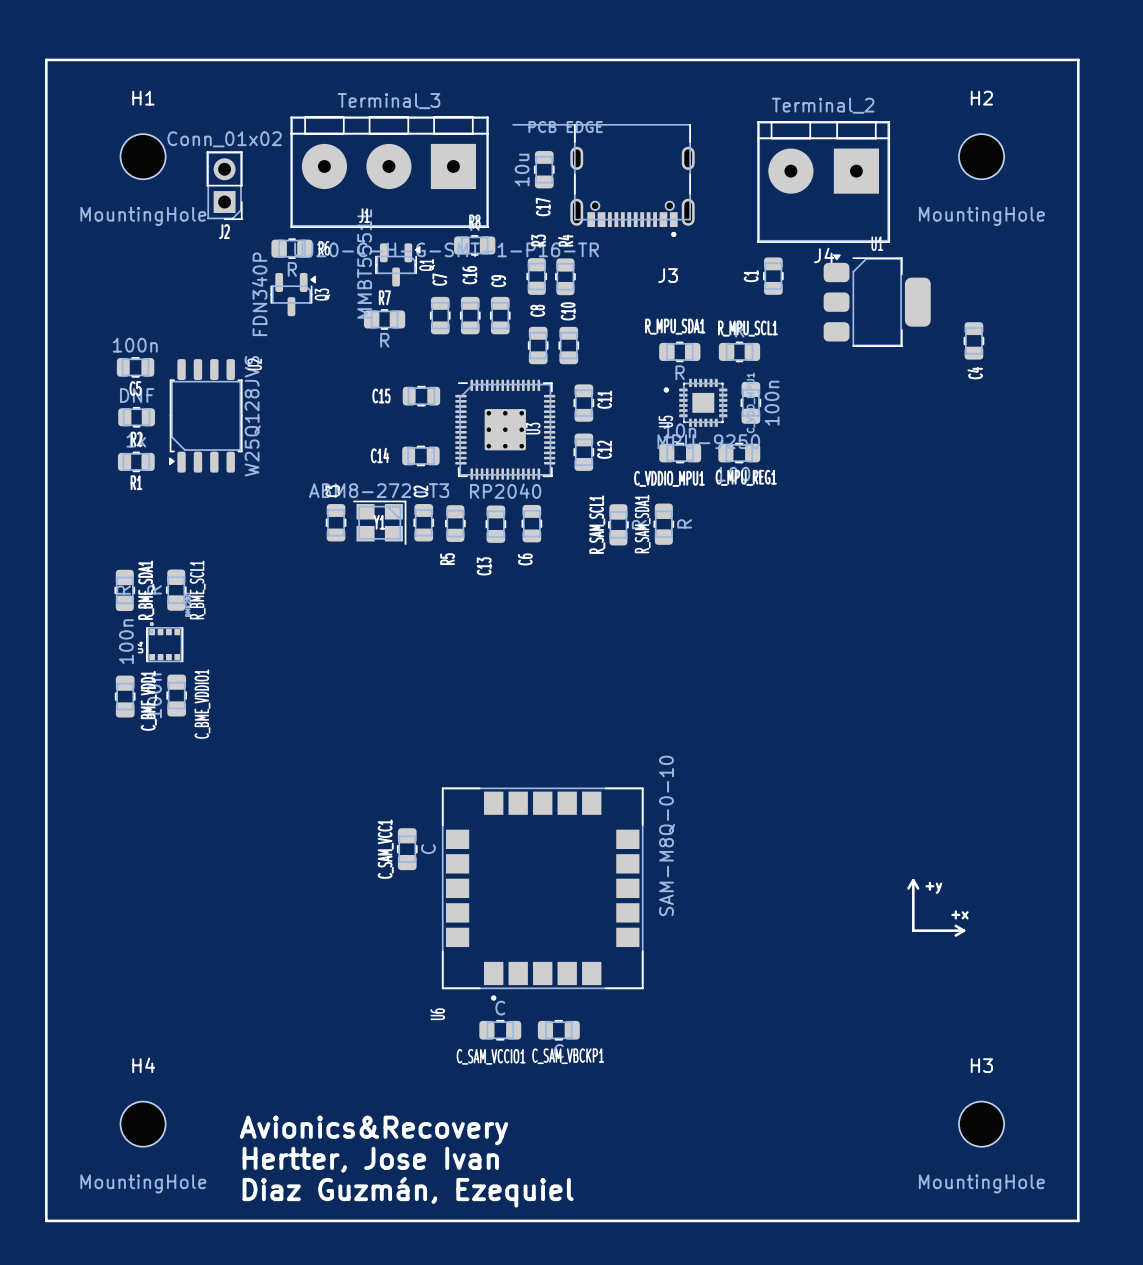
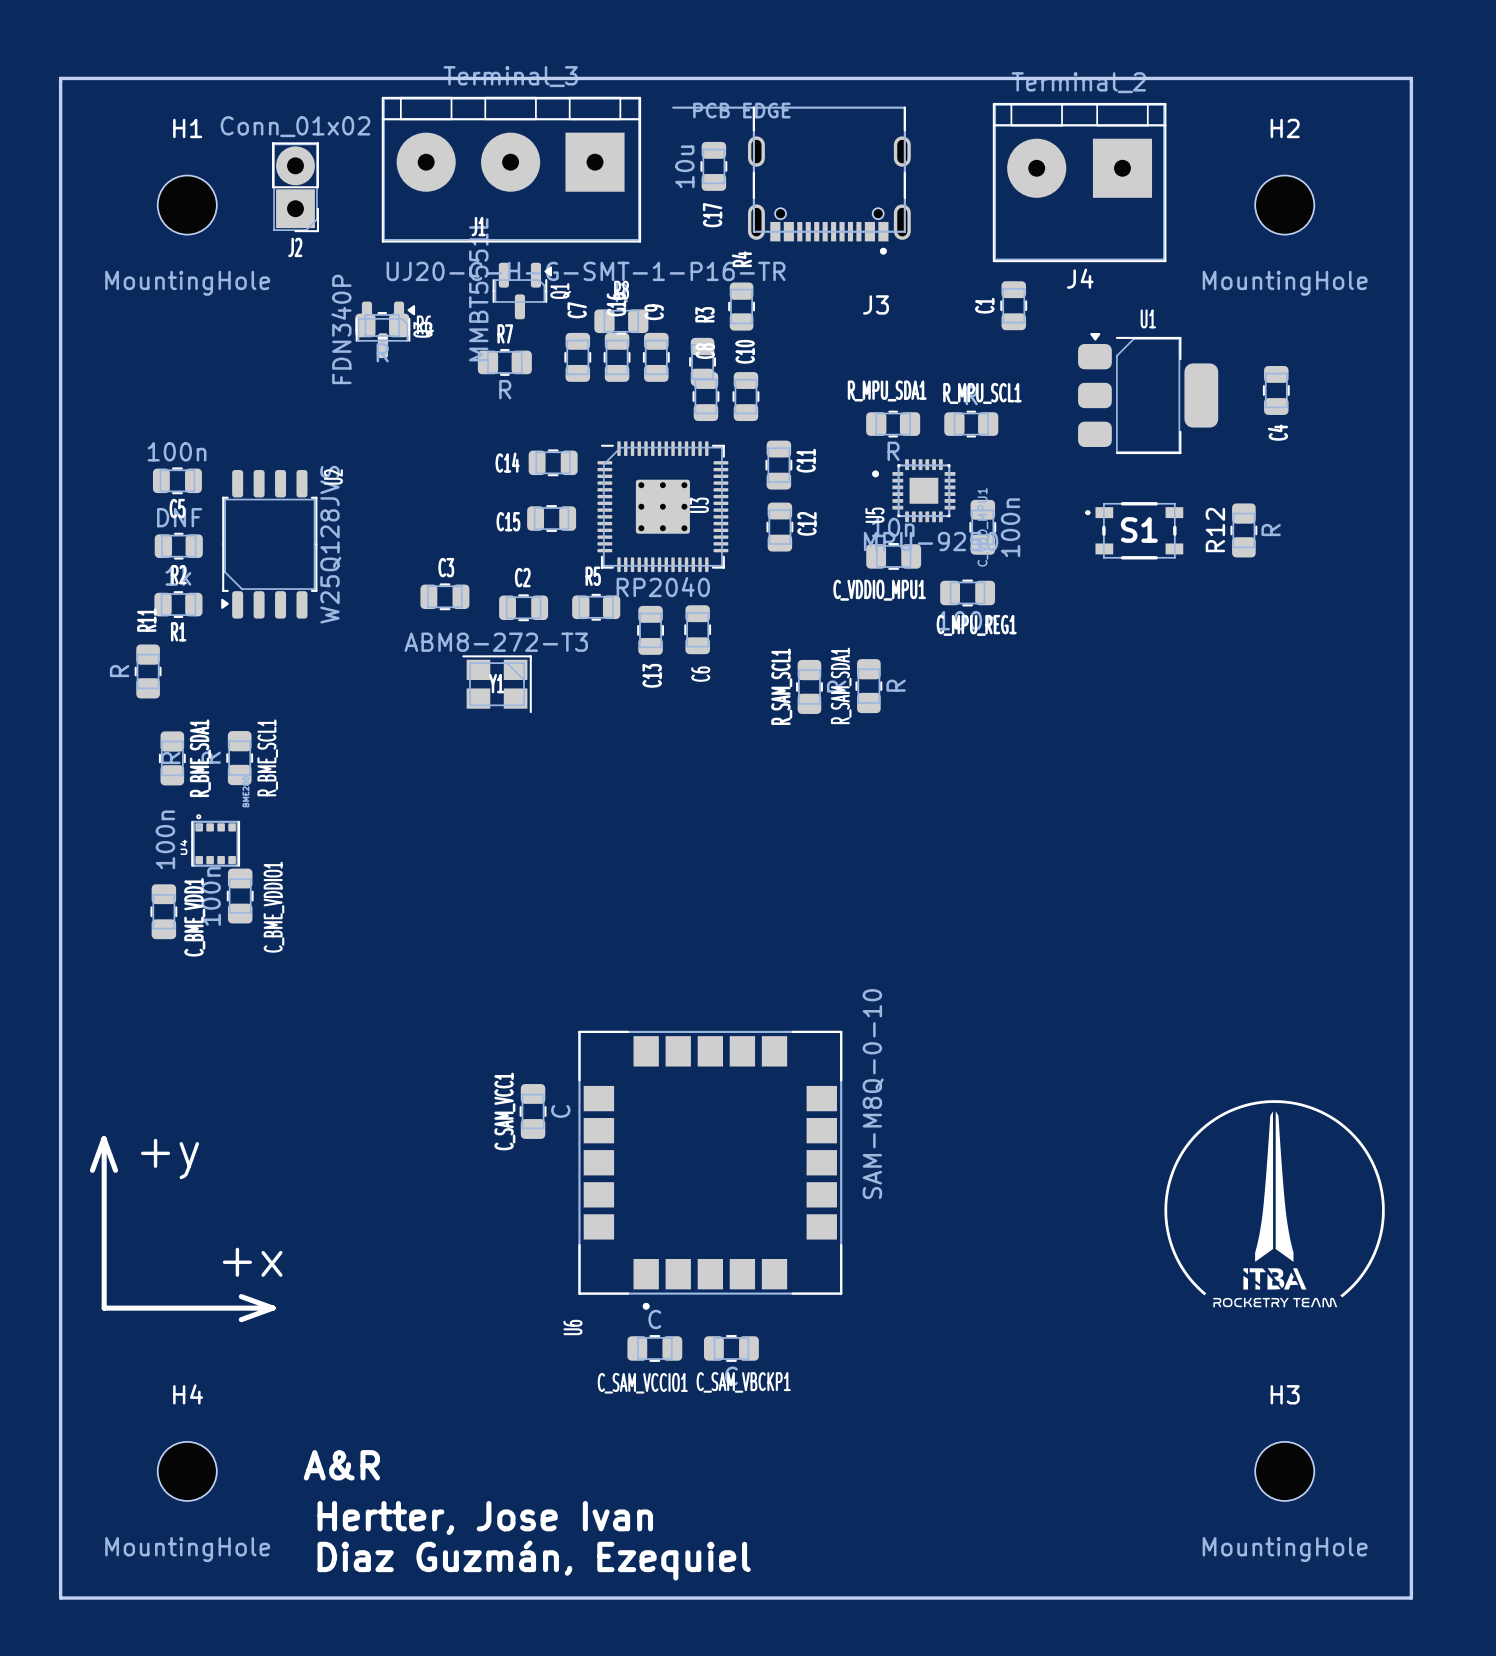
line: (46, 59) (1078, 59) (1078, 1220) (46, 1220) (46, 59) -> none
board edge: none -> (60, 78) (1411, 78) (1411, 1598) (60, 1598) (60, 78)
J2 footprint: [206, 151, 243, 220] -> [272, 142, 319, 233]
C17 position: (544, 169) -> (713, 166)
J1 position: (389, 172) -> (511, 169)
J3 position: (603, 180) -> (791, 180)
J4 position: (823, 182) -> (1079, 182)
Q1 position: (397, 264) -> (522, 291)
R4 position: (565, 276) -> (741, 306)
C1 position: (773, 276) -> (1013, 305)
Q3 position: (293, 294) -> (385, 329)
C7 position: (440, 315) -> (577, 357)
C16 position: (470, 315) -> (617, 357)
C9 position: (500, 315) -> (656, 357)
R7 position: (384, 319) -> (504, 362)
C4 position: (973, 340) -> (1276, 390)
C8 position: (538, 345) -> (705, 396)
C10 position: (568, 345) -> (745, 396)
R_MPU_SDA1 position: (679, 351) -> (893, 424)
R_MPU_SCL1 position: (739, 351) -> (971, 424)
C15: none -> (553, 462)
C15 name: C15 (381, 396) -> C14 (507, 462)
U5 position: (695, 402) -> (913, 490)
C11 position: (583, 403) -> (778, 465)
S1: none -> (1134, 530)
R12: none -> R (1243, 530)
U3 position: (505, 429) -> (662, 506)
C12 position: (583, 452) -> (779, 527)
C_VDDIO_MPU1 position: (680, 453) -> (893, 556)
C14: (420, 455) -> none
R11: none -> R (148, 671)
C3 rotation: 0° (336, 522) -> 90° clockwise (444, 596)
C3 position: (336, 522) -> (444, 596)
C2 rotation: 0° (423, 522) -> 90° clockwise (523, 607)
C2 position: (423, 522) -> (523, 607)
R5 rotation: 0° (455, 523) -> 90° clockwise (596, 607)
R5 position: (455, 523) -> (596, 607)
C6 position: (531, 523) -> (697, 629)
C13 position: (495, 524) -> (650, 630)
R5 name position: R5 (447, 559) -> R5 (593, 576)
C6 name position: C6 (525, 559) -> C6 (700, 674)
C13 name position: C13 (484, 566) -> C13 (652, 675)
R_BME_SDA1 position: (124, 590) -> (172, 758)
R_BME_SCL1 position: (176, 590) -> (239, 758)
C_BME_VDDIO1 position: (176, 695) -> (240, 896)
drawing: none -> [1164, 1100, 1385, 1308]
line: none -> (104, 1139) (104, 1308) (273, 1308)
line: (913, 880) (908, 888) -> none
line: (913, 880) (918, 888) -> none
line: (913, 880) (913, 930) (964, 930) -> none
text: none -> +y (170, 1158)
text: +y (933, 887) -> none
line: none -> (92, 1170) (103, 1138) (115, 1170)
text: +x (959, 914) -> none
line: (955, 925) (964, 930) -> none
line: (964, 930) (955, 935) -> none
text: none -> +x (252, 1262)
line: none -> (241, 1296) (273, 1308)
line: none -> (273, 1308) (241, 1319)
text: Avionics&Recovery (373, 1130) -> A&R (341, 1465)

